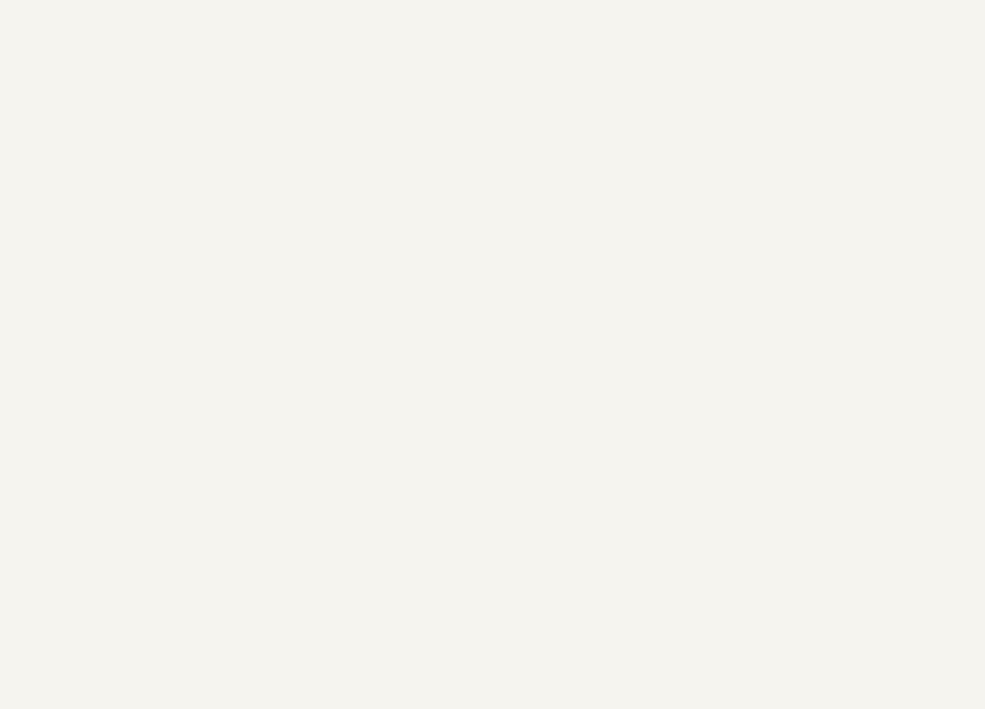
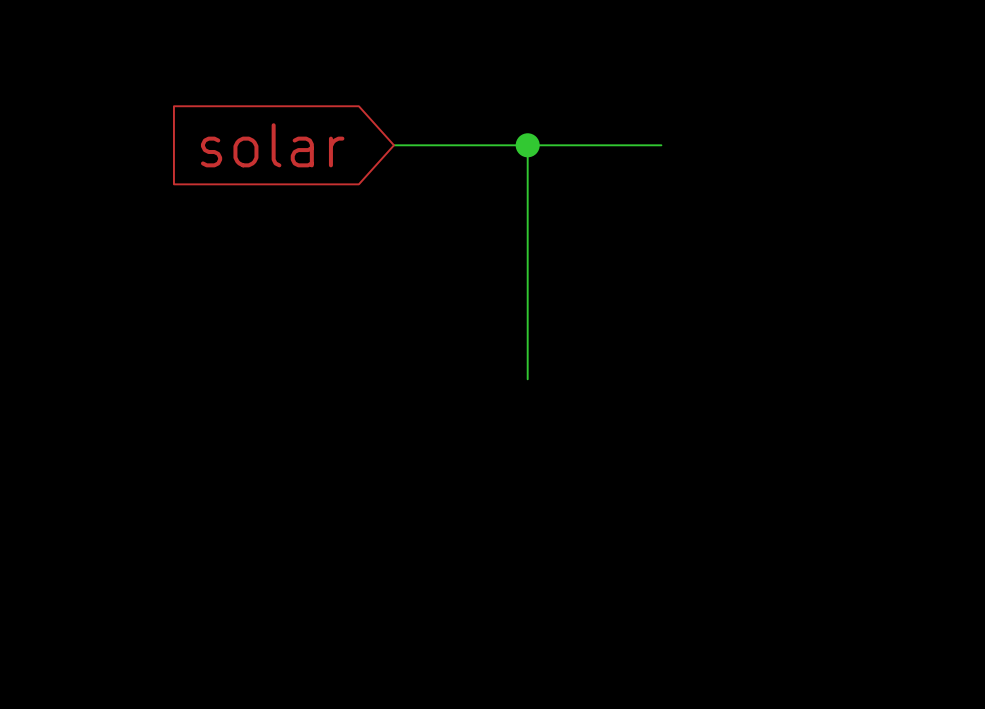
global label: none -> solar (272, 145)
wire: none -> (393, 145) (661, 145)
wire: none -> (527, 145) (527, 379)
junction: none -> (527, 145)

